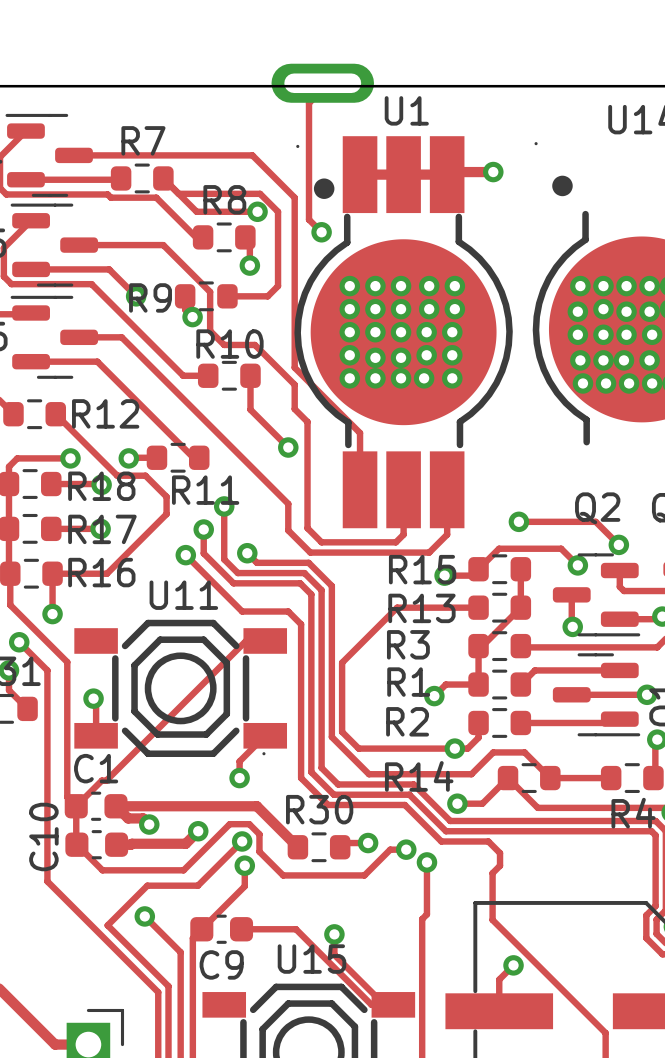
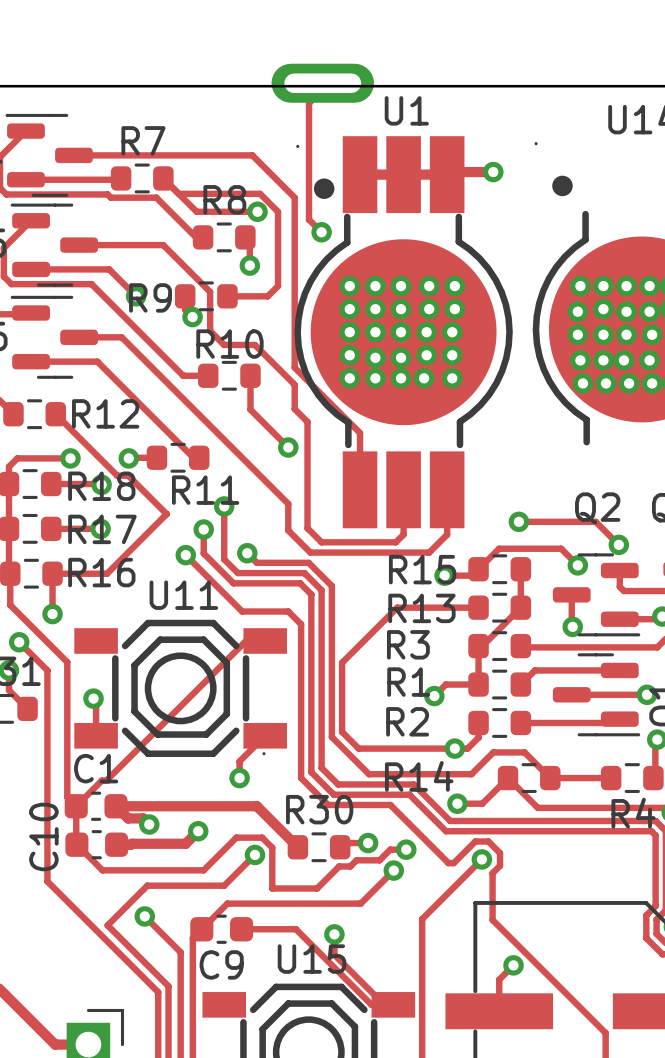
track: (128, 475) (145, 475) (166, 496) (166, 514) -> (128, 475) (166, 514)
track: (390, 804) (404, 804) (441, 841) (475, 841) -> (390, 804) (448, 863) (453, 863) (475, 841)
track: (242, 841) (197, 885) -> (254, 854) (224, 885) (197, 885)
via: (242, 841) -> none
via: none -> (254, 854)
via: none -> (481, 859)
track: (379, 860) (364, 875) (283, 875) (259, 851) (259, 834) (249, 824) (229, 824) (183, 870) -> (379, 860) (356, 860) (350, 866) (339, 866) (317, 888) (272, 888) (272, 847) (262, 837) (236, 837) (203, 870) (183, 870)
track: (426, 862) (426, 914) -> (482, 858) (426, 914)
via: (426, 862) -> none
track: (244, 865) (244, 886) (227, 903) -> (393, 870) (360, 903) (227, 903)
via: (244, 865) -> none
via: none -> (393, 870)

